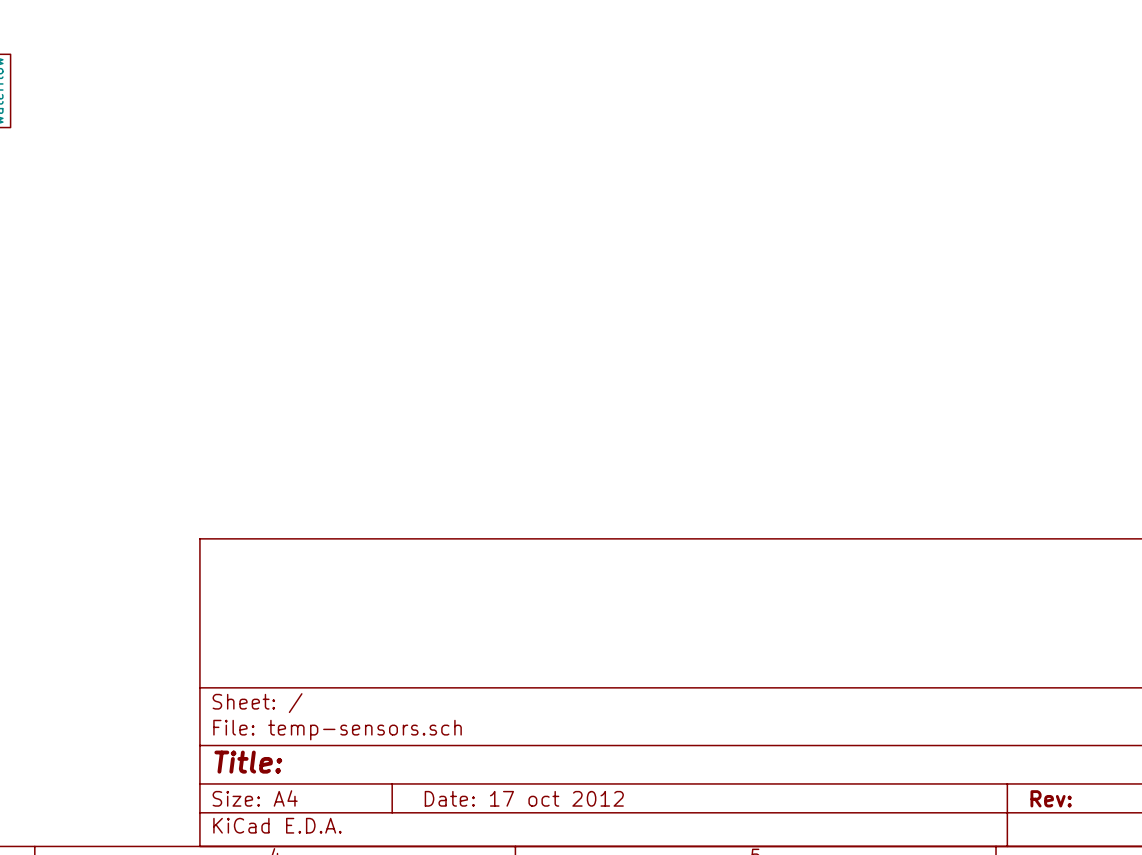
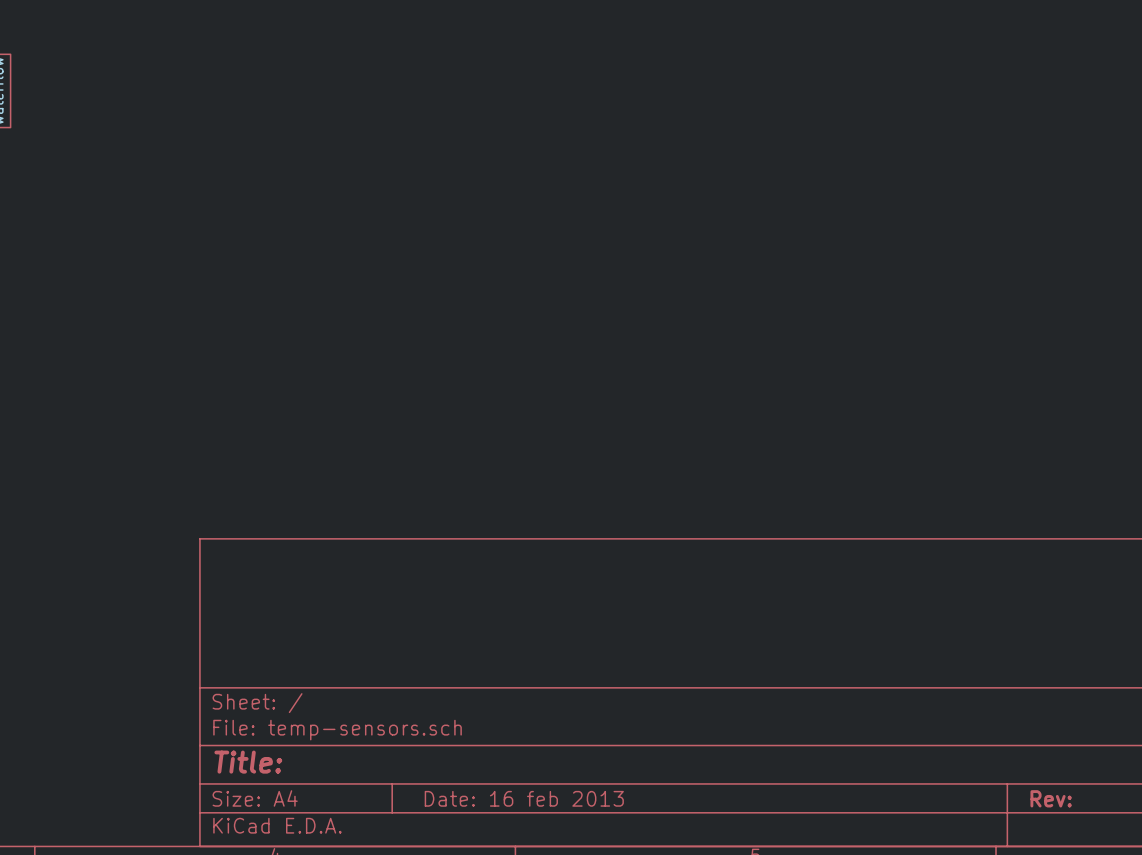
title block: Date: 17 oct 2012 (524, 798) -> Date: 16 feb 2013 (524, 798)

